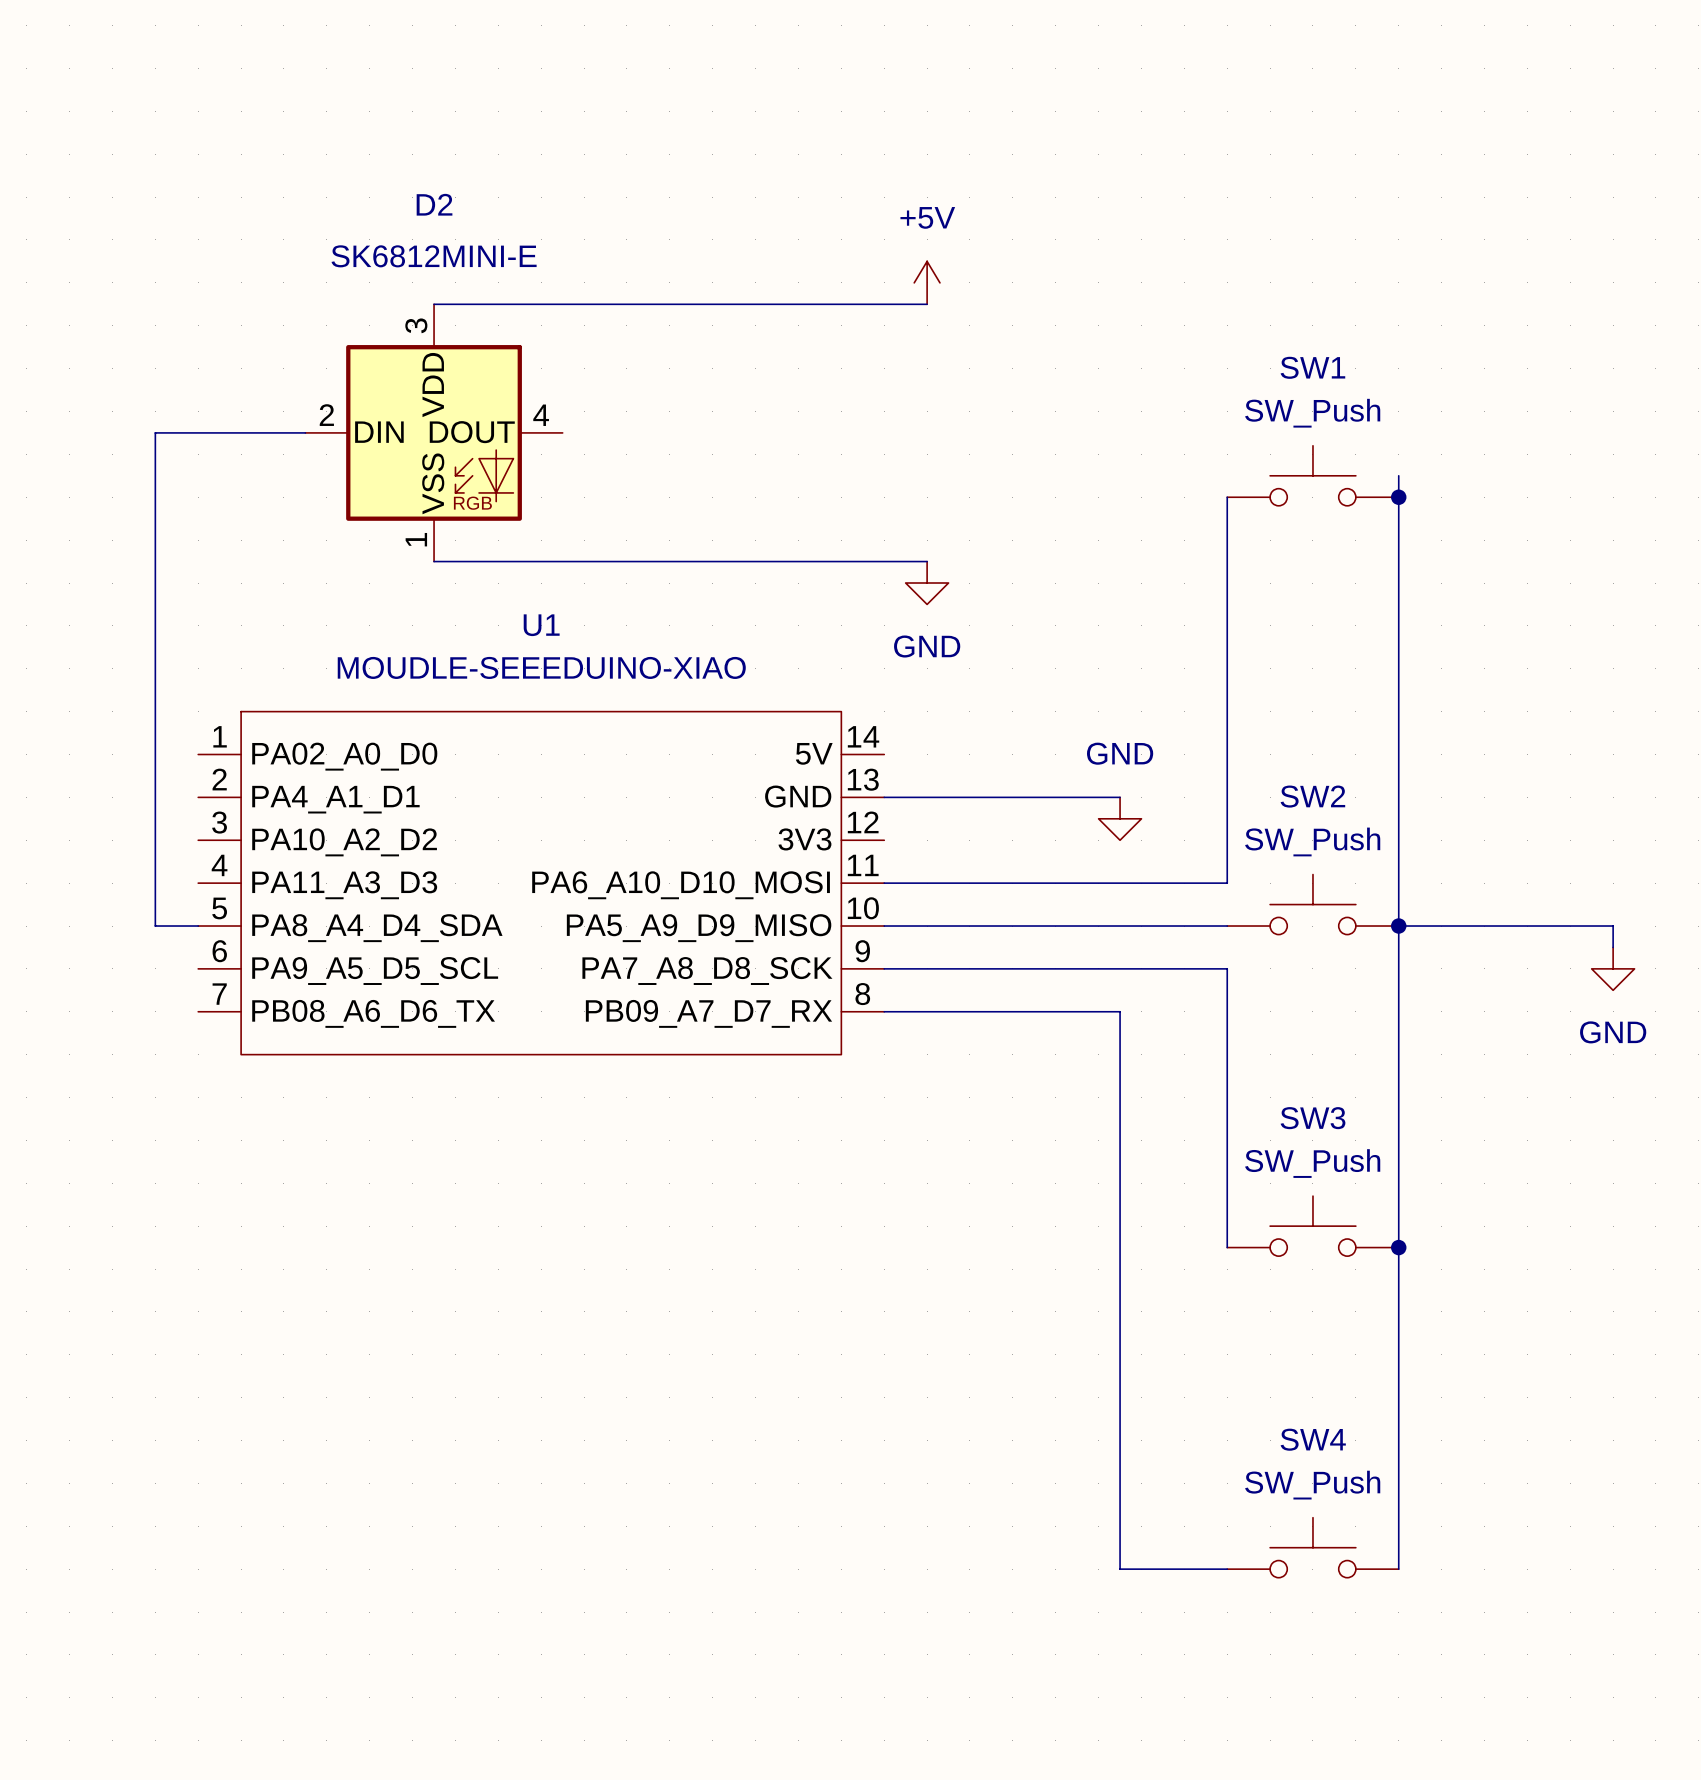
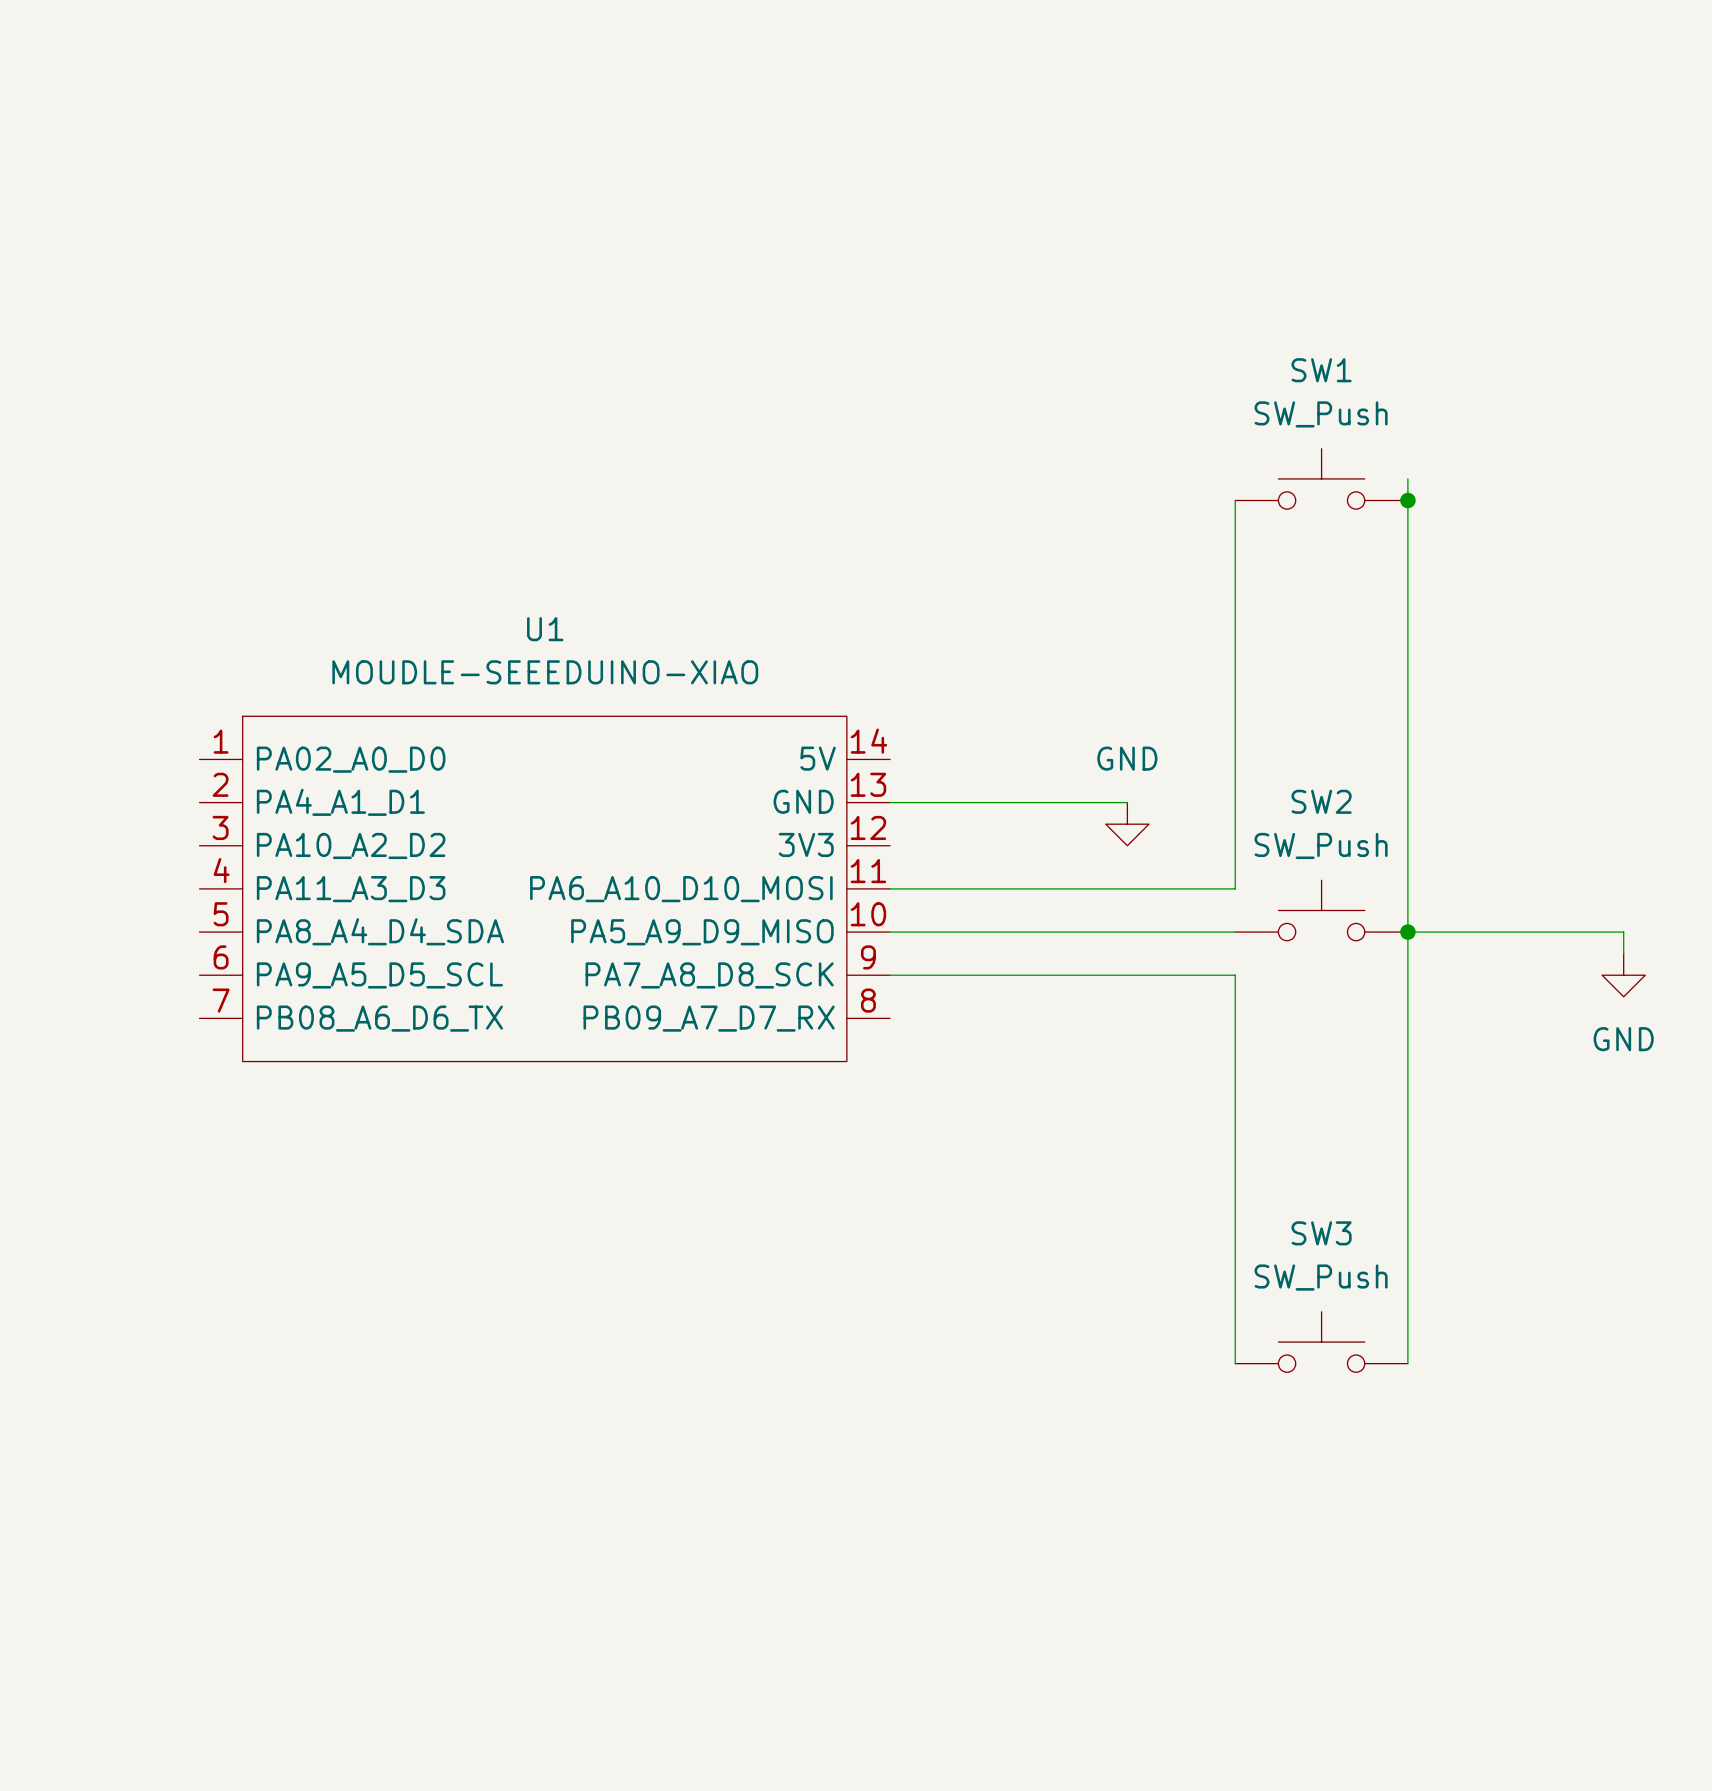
power symbol: +5V (927, 282) -> none
wire: (434, 304) (927, 304) -> none
wire: (305, 432) (155, 432) (155, 926) (198, 926) -> none
D2: SK6812MINI-E (434, 432) -> none
wire: (434, 561) (927, 561) -> none
power symbol: GND (927, 583) -> none
wire: (884, 1011) (1120, 1011) (1120, 1569) (1227, 1569) -> none
SW3 position: (1312, 1226) -> (1321, 1342)
wire: none -> (1235, 1255) (1235, 1363)
junction: (1398, 1247) -> none
wire: (1398, 1354) (1398, 1569) -> none
SW4: SW_Push (1312, 1547) -> none

